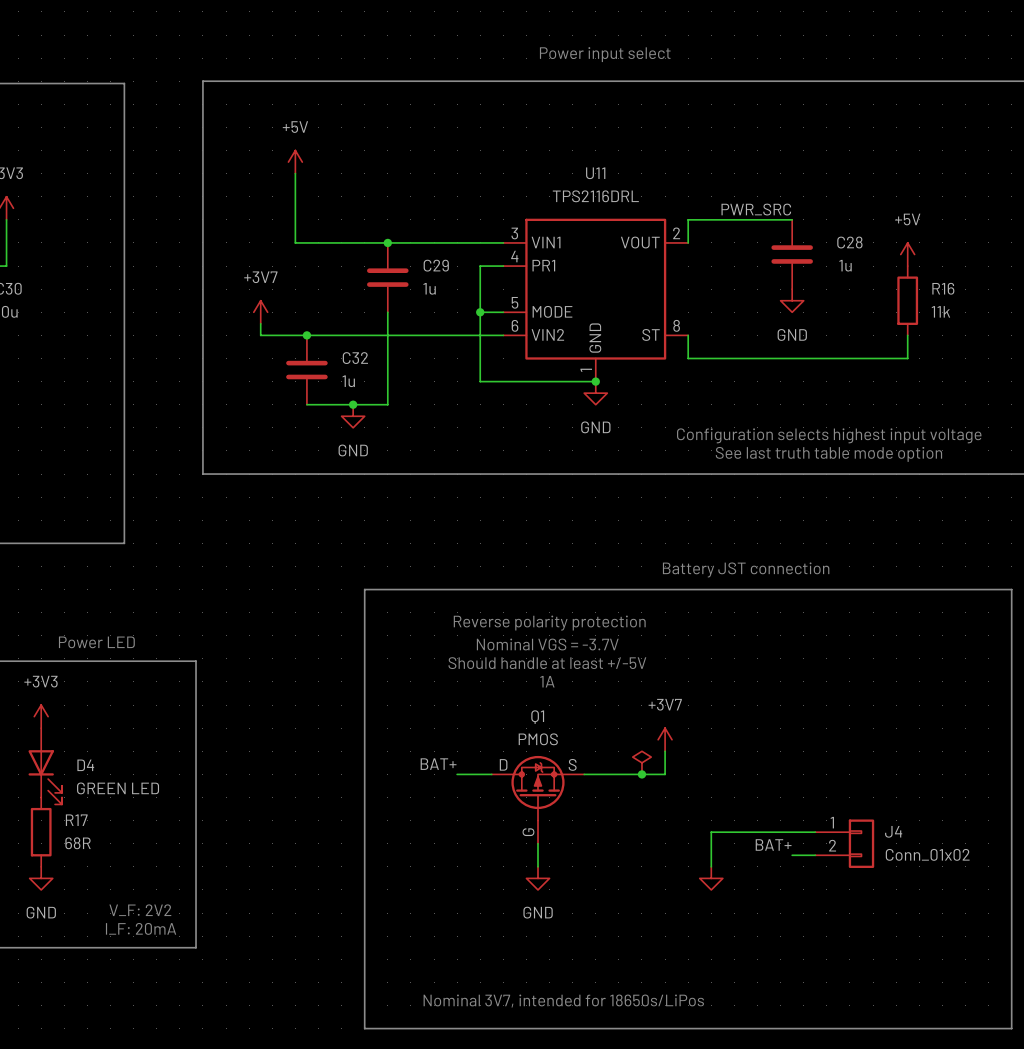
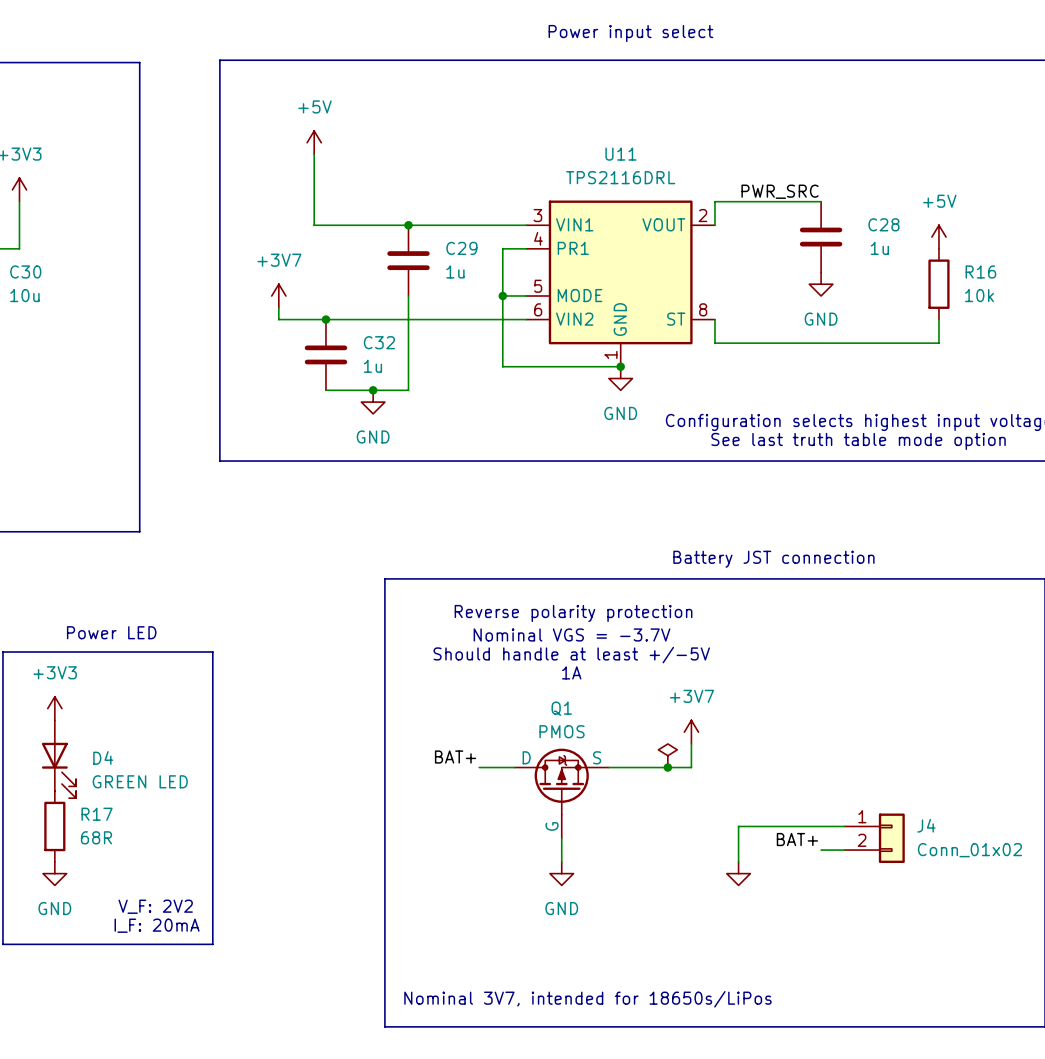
R16 value: 11k (940, 311) -> 10k (979, 295)

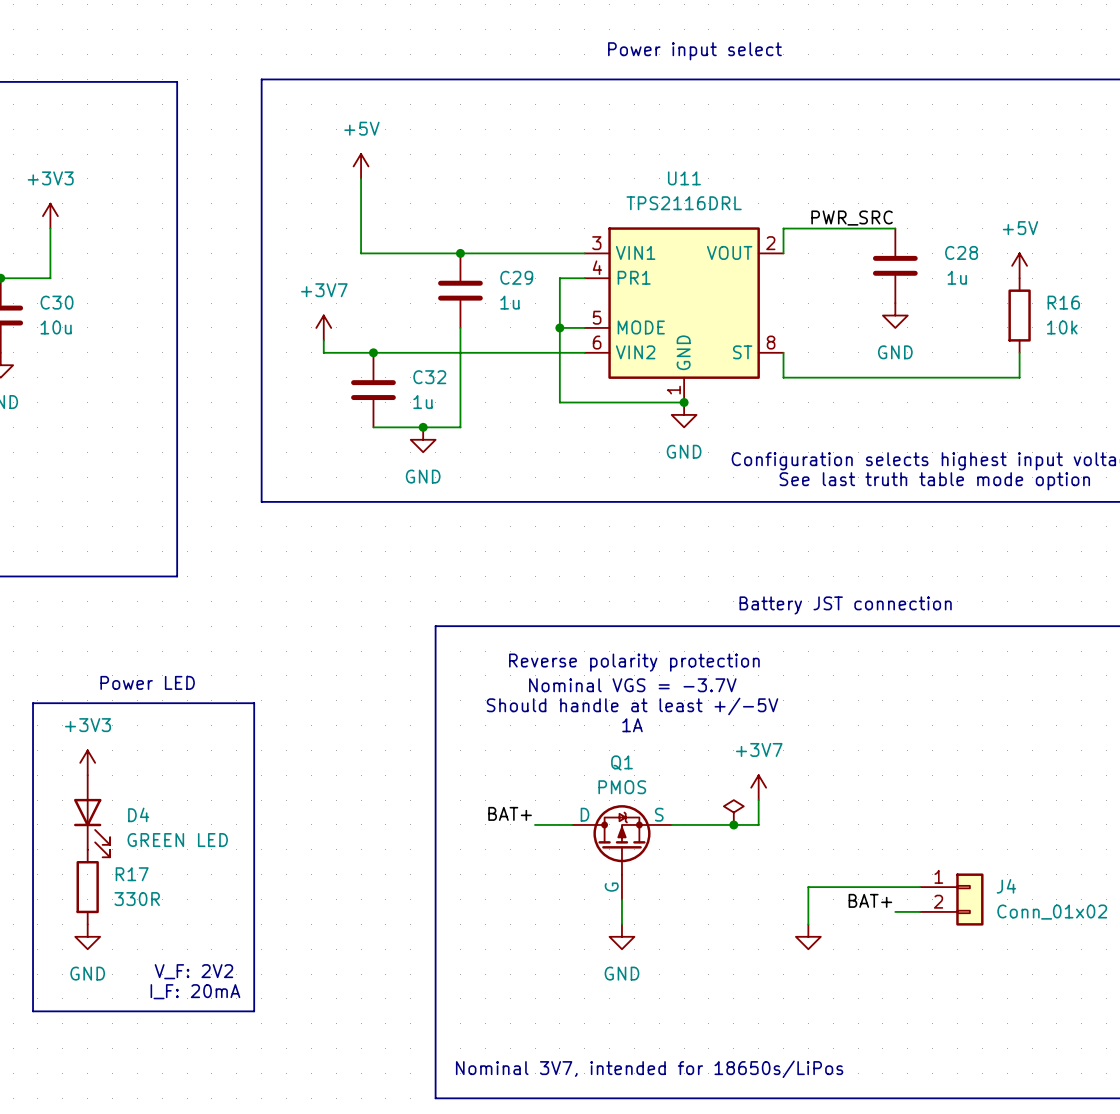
R17 value: 68R (96, 837) -> 330R (137, 899)

